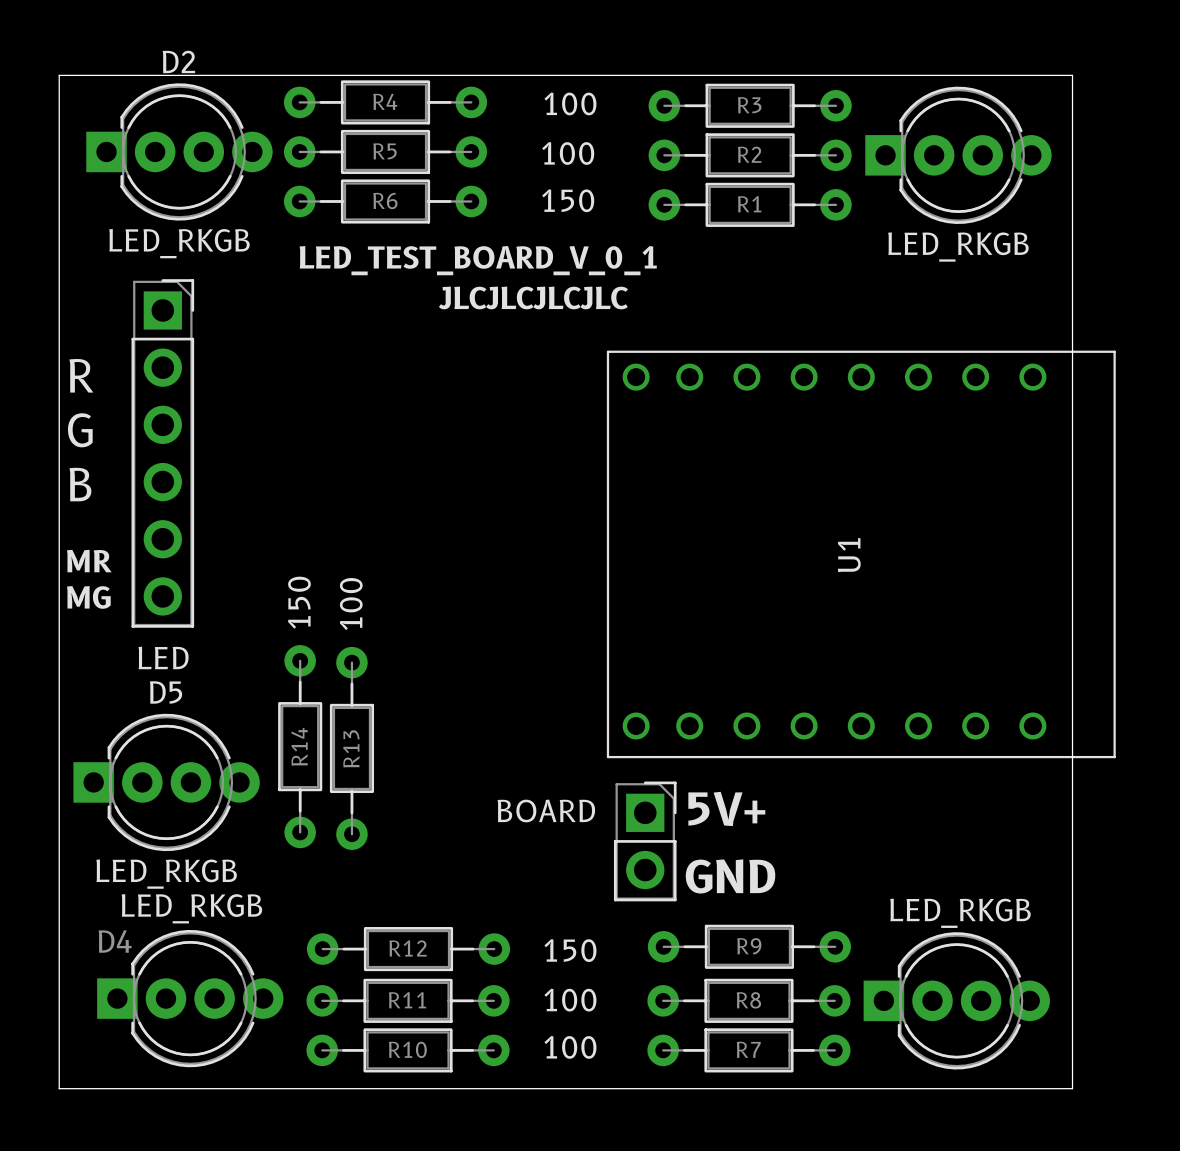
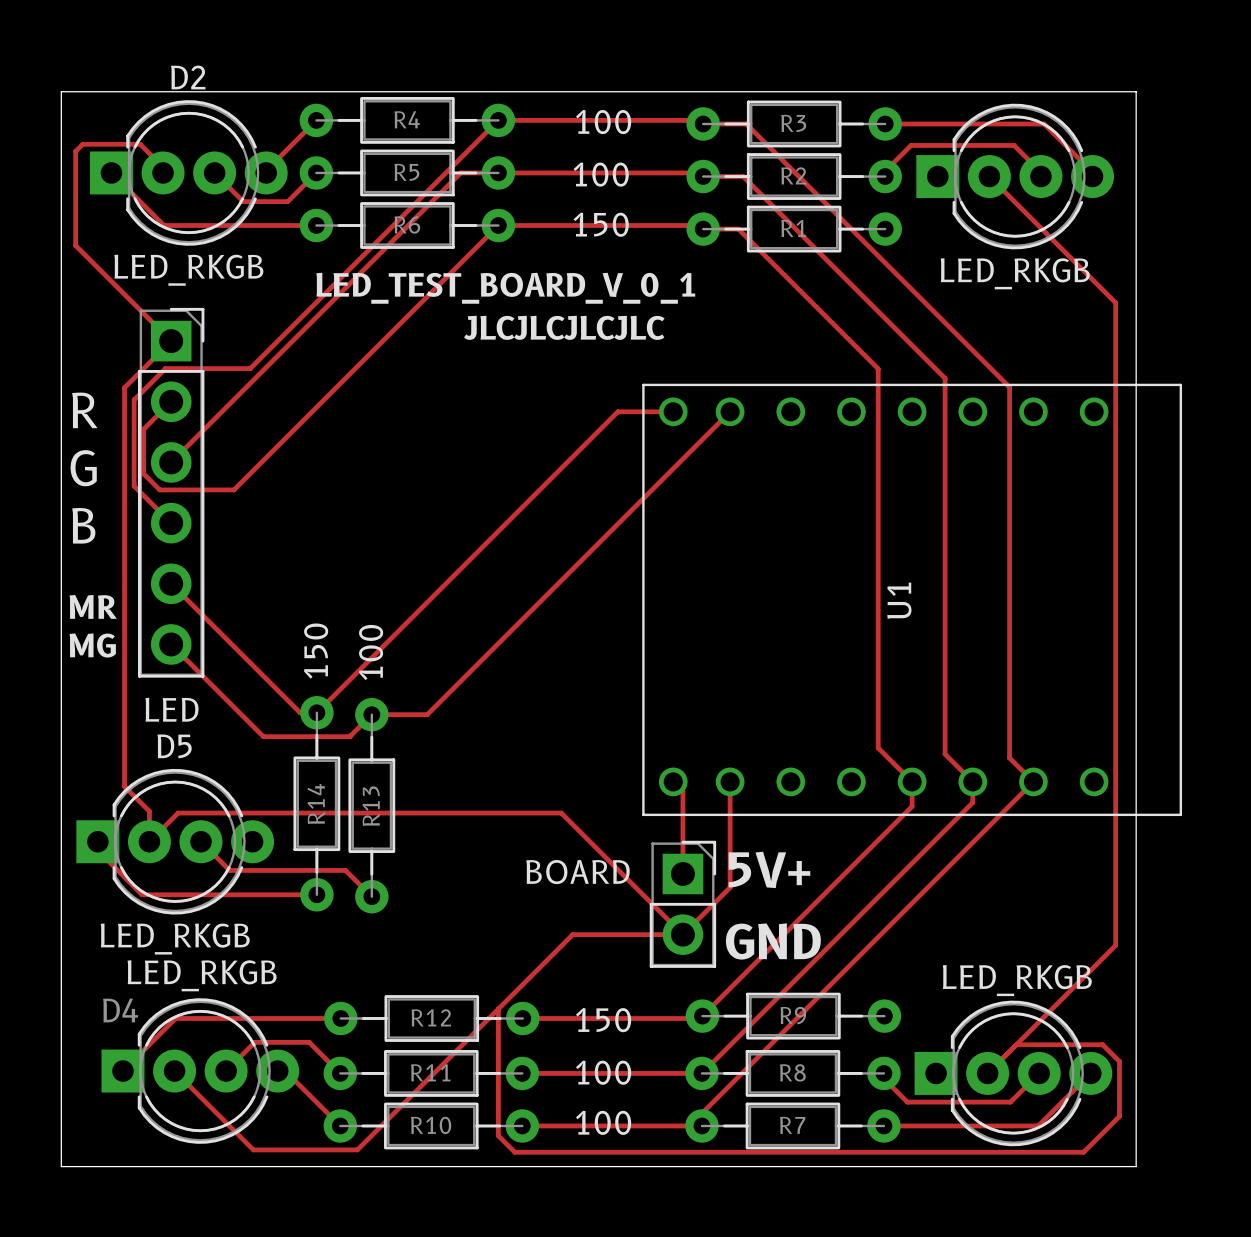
top track: none -> (316, 120) (266, 170) (266, 172)
top track: none -> (885, 123) (1044, 123) (1094, 174)
top track: none -> (111, 172) (164, 225) (316, 225)
top track: none -> (163, 172) (163, 167) (140, 144) (82, 144) (75, 151) (75, 245) (171, 341) (124, 387) (124, 786) (149, 811) (149, 841) (178, 813) (561, 813) (682, 934)
top track: none -> (214, 172) (243, 201) (287, 201) (316, 172)
top track: none -> (1042, 174) (1014, 145) (910, 145) (885, 171) (885, 176)
top track: none -> (989, 176) (1115, 302) (1115, 945) (987, 1073)
top track: none -> (500, 223) (233, 489) (159, 489) (143, 473) (143, 429) (171, 401)
top track: none -> (498, 225) (699, 225) (703, 229) (738, 229) (878, 368) (878, 747) (912, 781)
top track: none -> (673, 411) (617, 411) (316, 712) (300, 712) (171, 583)
top track: none -> (730, 411) (427, 714) (371, 714) (349, 736) (263, 736) (171, 644)
top track: none -> (187, 462) (171, 462) (460, 172) (699, 172) (703, 176) (743, 176) (945, 378) (945, 754) (972, 781) (972, 802) (701, 1073) (522, 1073)
top track: none -> (171, 523) (134, 486) (134, 399) (165, 368) (250, 368) (498, 120) (699, 120) (703, 123) (746, 123) (1009, 387) (1009, 758) (1033, 781) (701, 1113) (701, 1125) (522, 1125)
top track: none -> (673, 781) (682, 791) (682, 873)
top track: none -> (730, 781) (730, 887) (682, 934)
top track: none -> (912, 781) (912, 806) (700, 1018) (522, 1018)
top track: none -> (201, 841) (229, 870) (345, 870) (371, 896)
top track: none -> (97, 850) (142, 894) (316, 894)
top track: none -> (682, 934) (572, 934) (357, 1149) (253, 1149) (174, 1071)
top track: none -> (498, 1008) (498, 1135) (514, 1152) (1083, 1152) (1119, 1116) (1119, 1061) (1102, 1044) (1016, 1044)
top track: none -> (340, 1018) (175, 1018) (122, 1071)
top track: none -> (226, 1071) (254, 1042) (309, 1042) (340, 1073)
top track: none -> (277, 1071) (285, 1071) (340, 1125)
top track: none -> (883, 1073) (883, 1078) (907, 1102) (1010, 1102) (1039, 1073)
top track: none -> (1090, 1073) (1038, 1125) (883, 1125)

